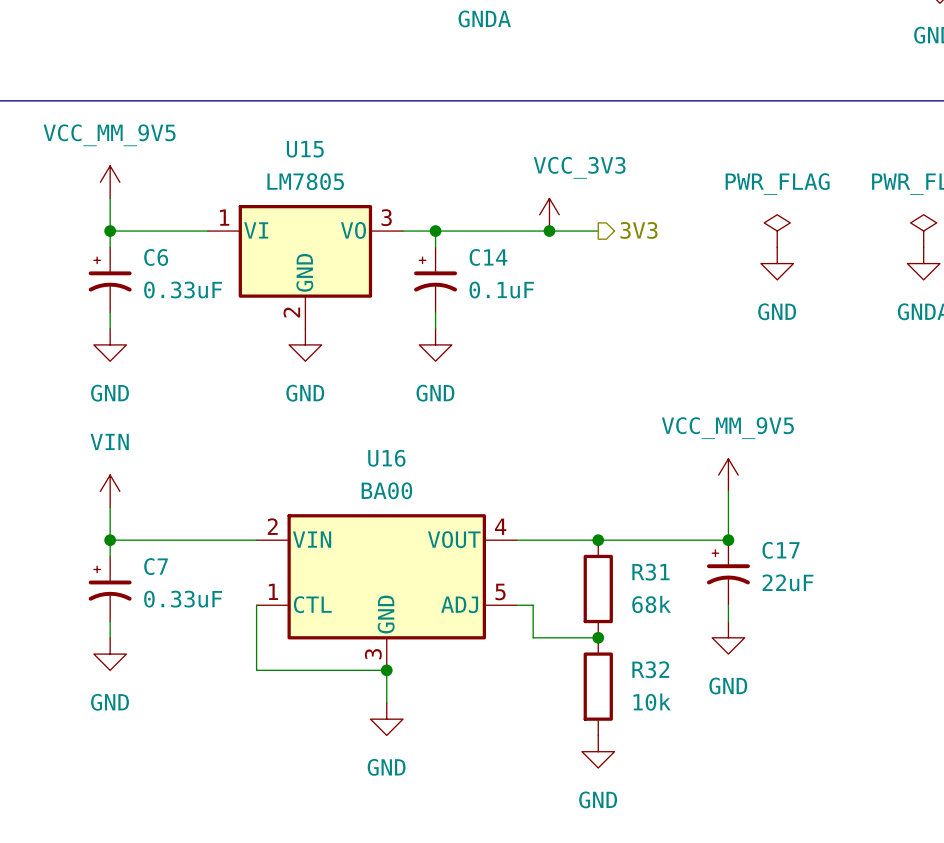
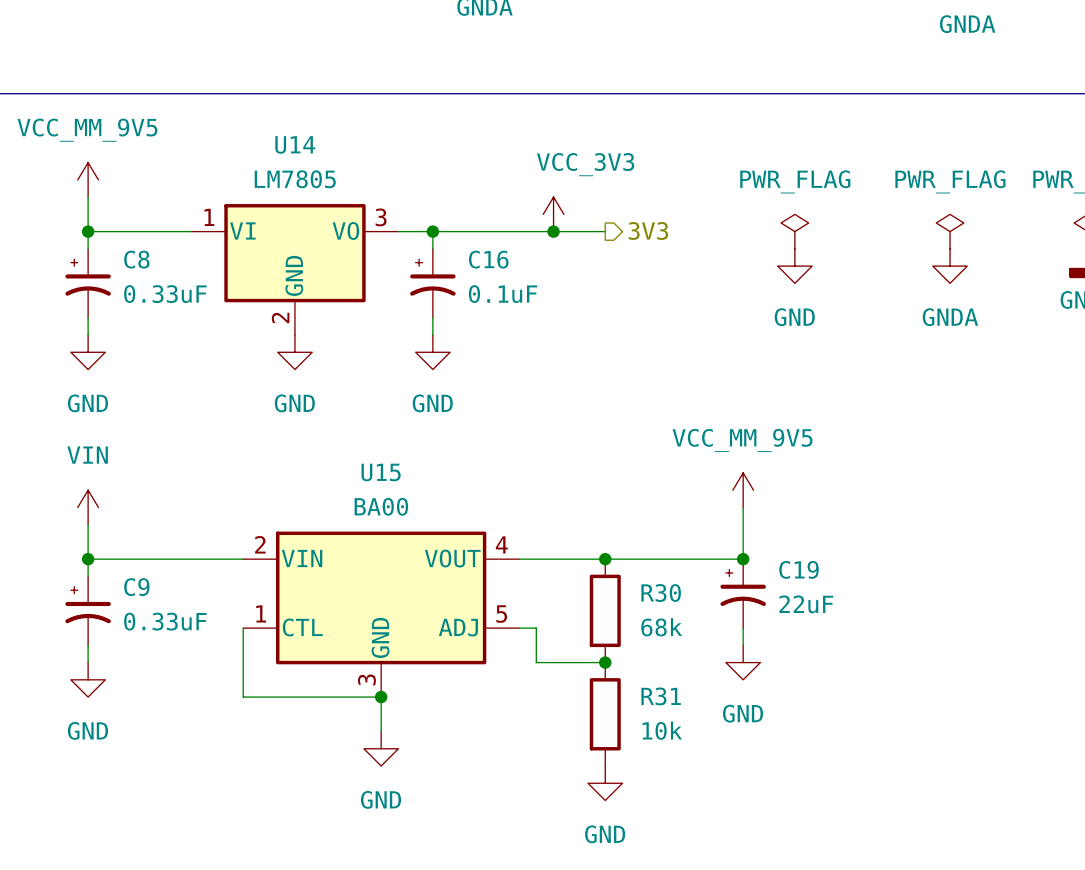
U15 name: U15 (305, 149) -> U14 (295, 144)
C6 name: C6 (156, 257) -> C8 (136, 259)
C14 name: C14 (488, 257) -> C16 (488, 259)
U16 name: U16 (386, 458) -> U15 (381, 472)
C17 name: C17 (781, 550) -> C19 (799, 569)
C7 name: C7 (156, 566) -> C9 (136, 587)
R31 name: R31 (650, 572) -> R30 (661, 593)
R32 name: R32 (650, 669) -> R31 (661, 696)

